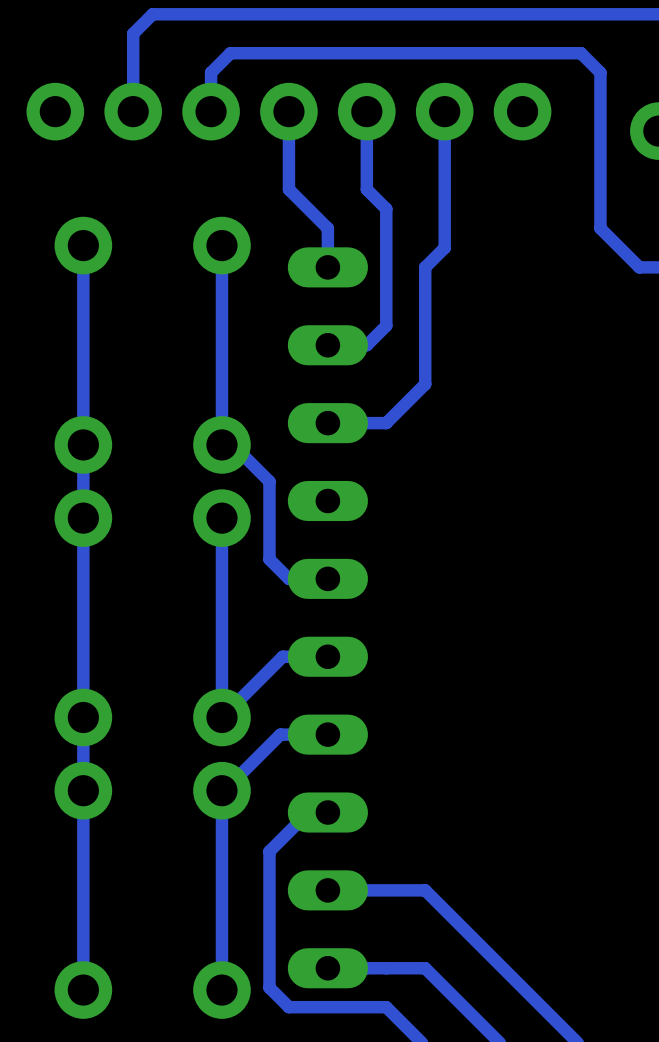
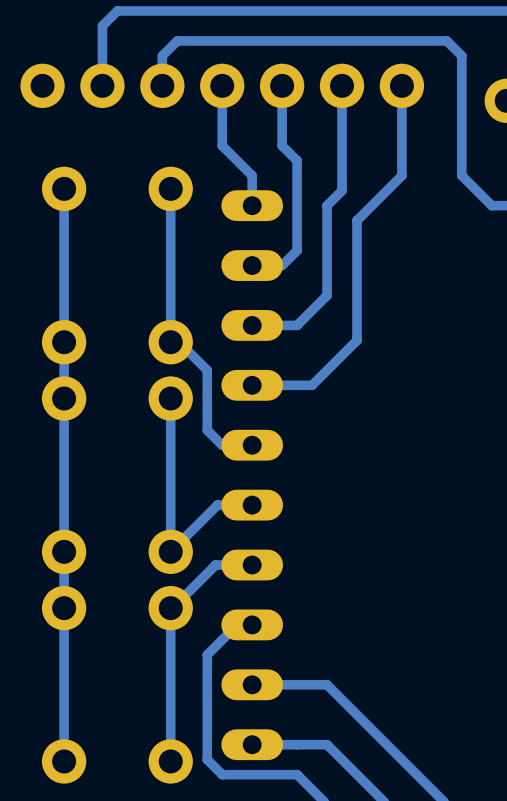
bottom track: none -> (401, 85) (401, 175) (357, 220) (357, 340) (312, 385) (252, 385)

